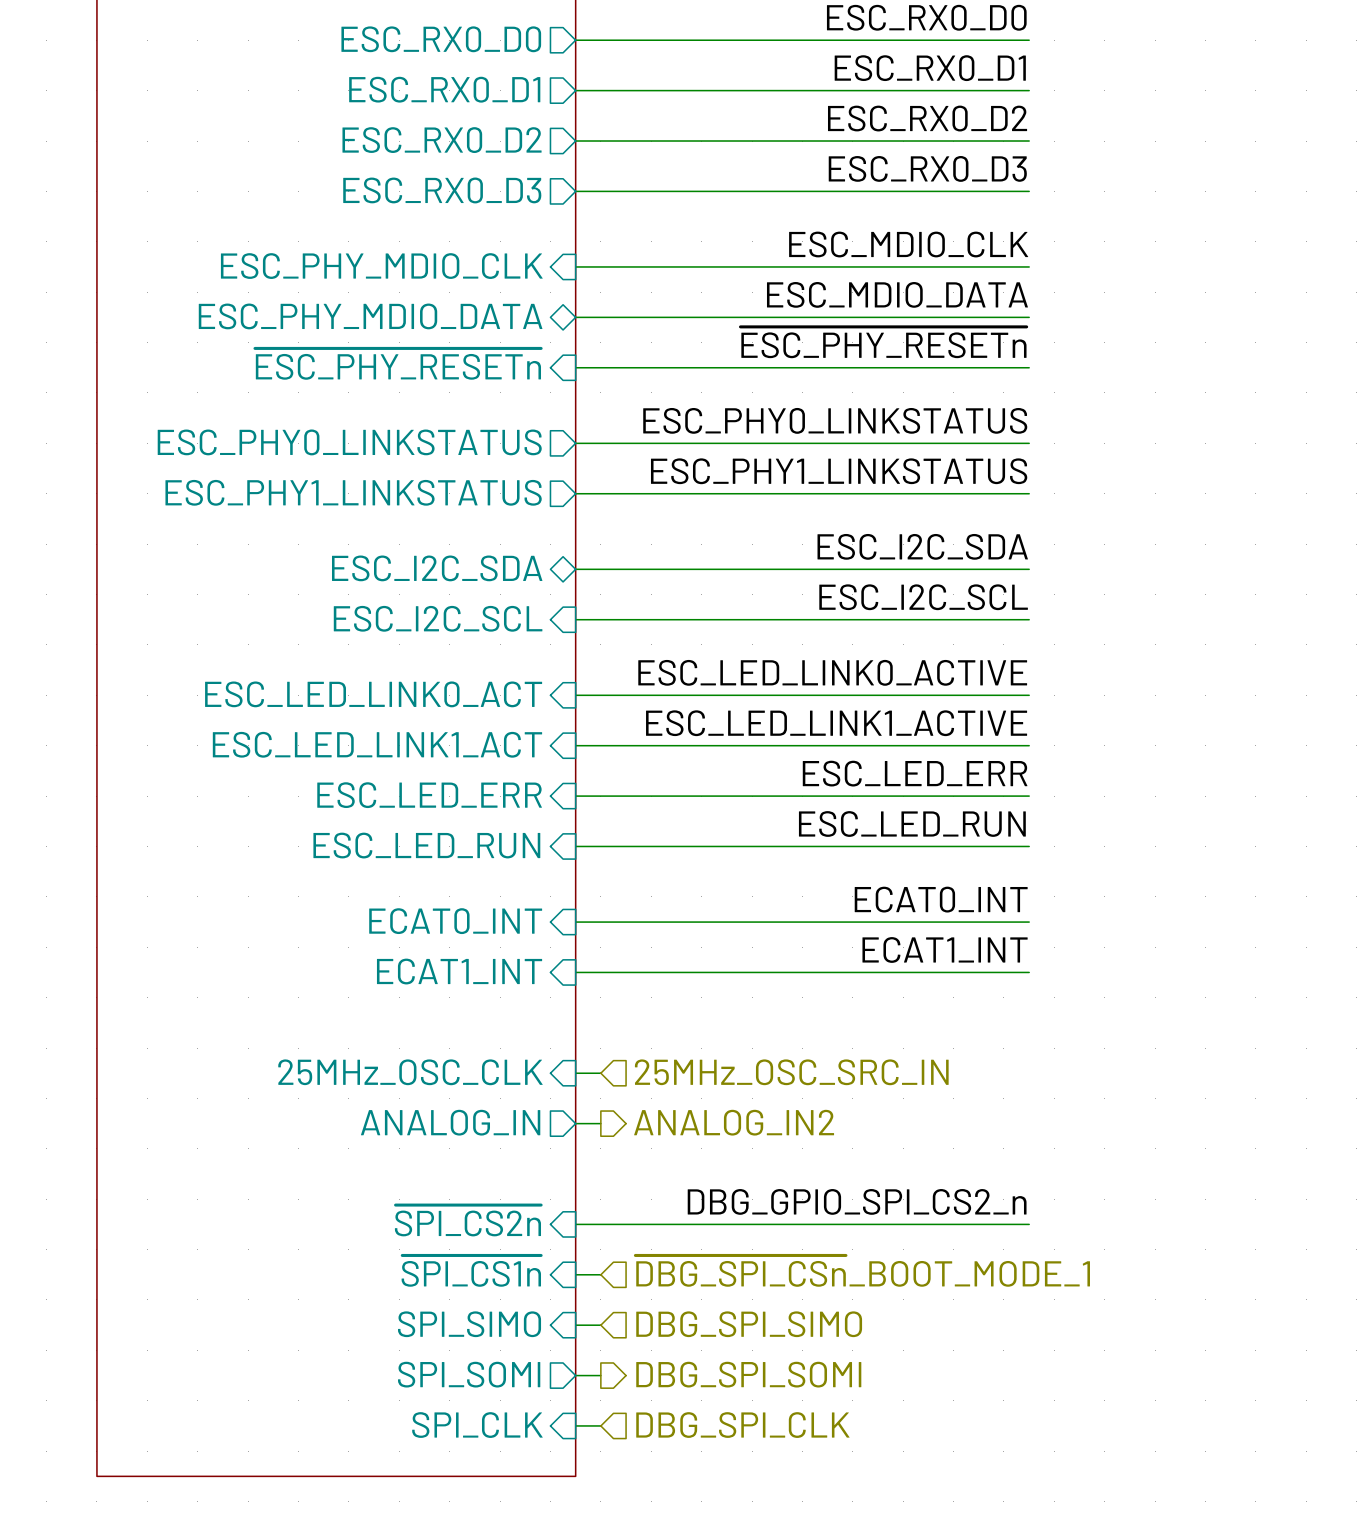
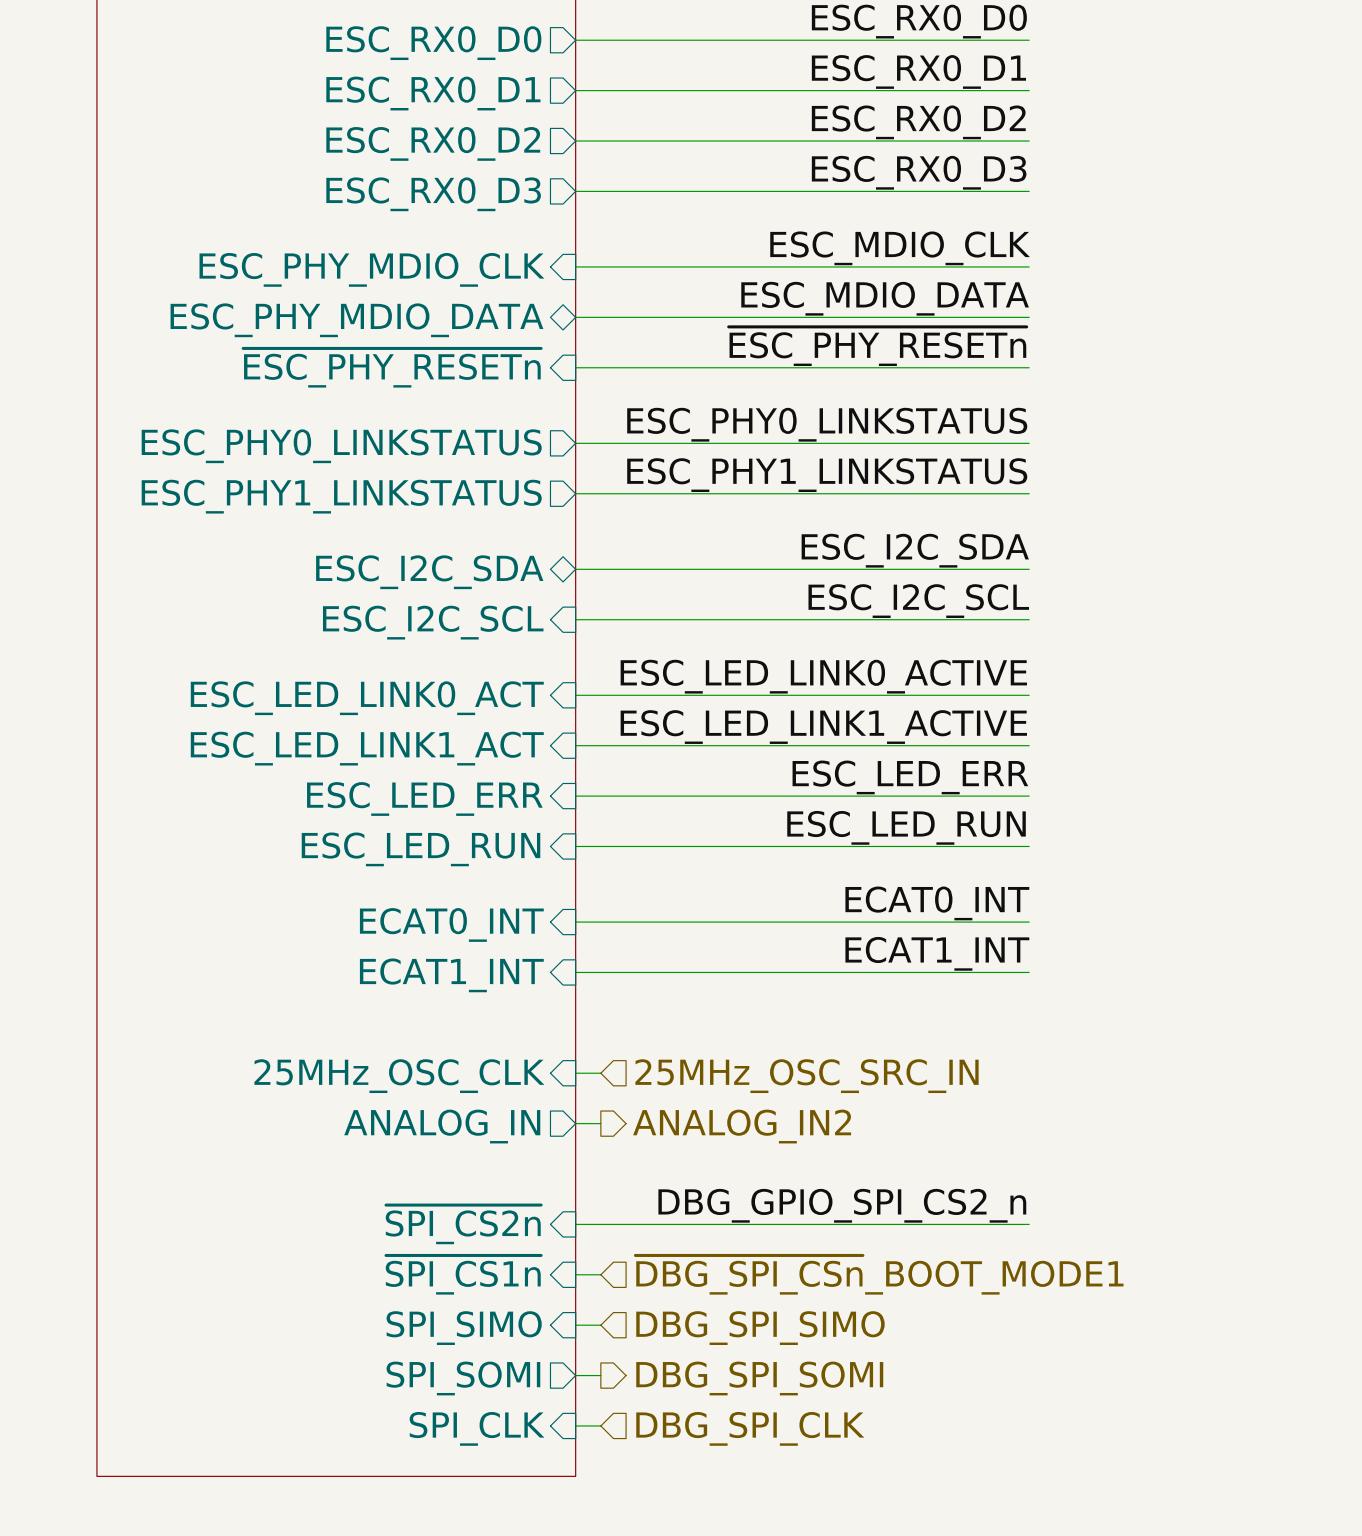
hierarchical label: ~{DBG_SPI_CSn}_BOOT_MODE_1 (862, 1271) -> ~{DBG_SPI_CSn}_BOOT_MODE1 (879, 1275)

